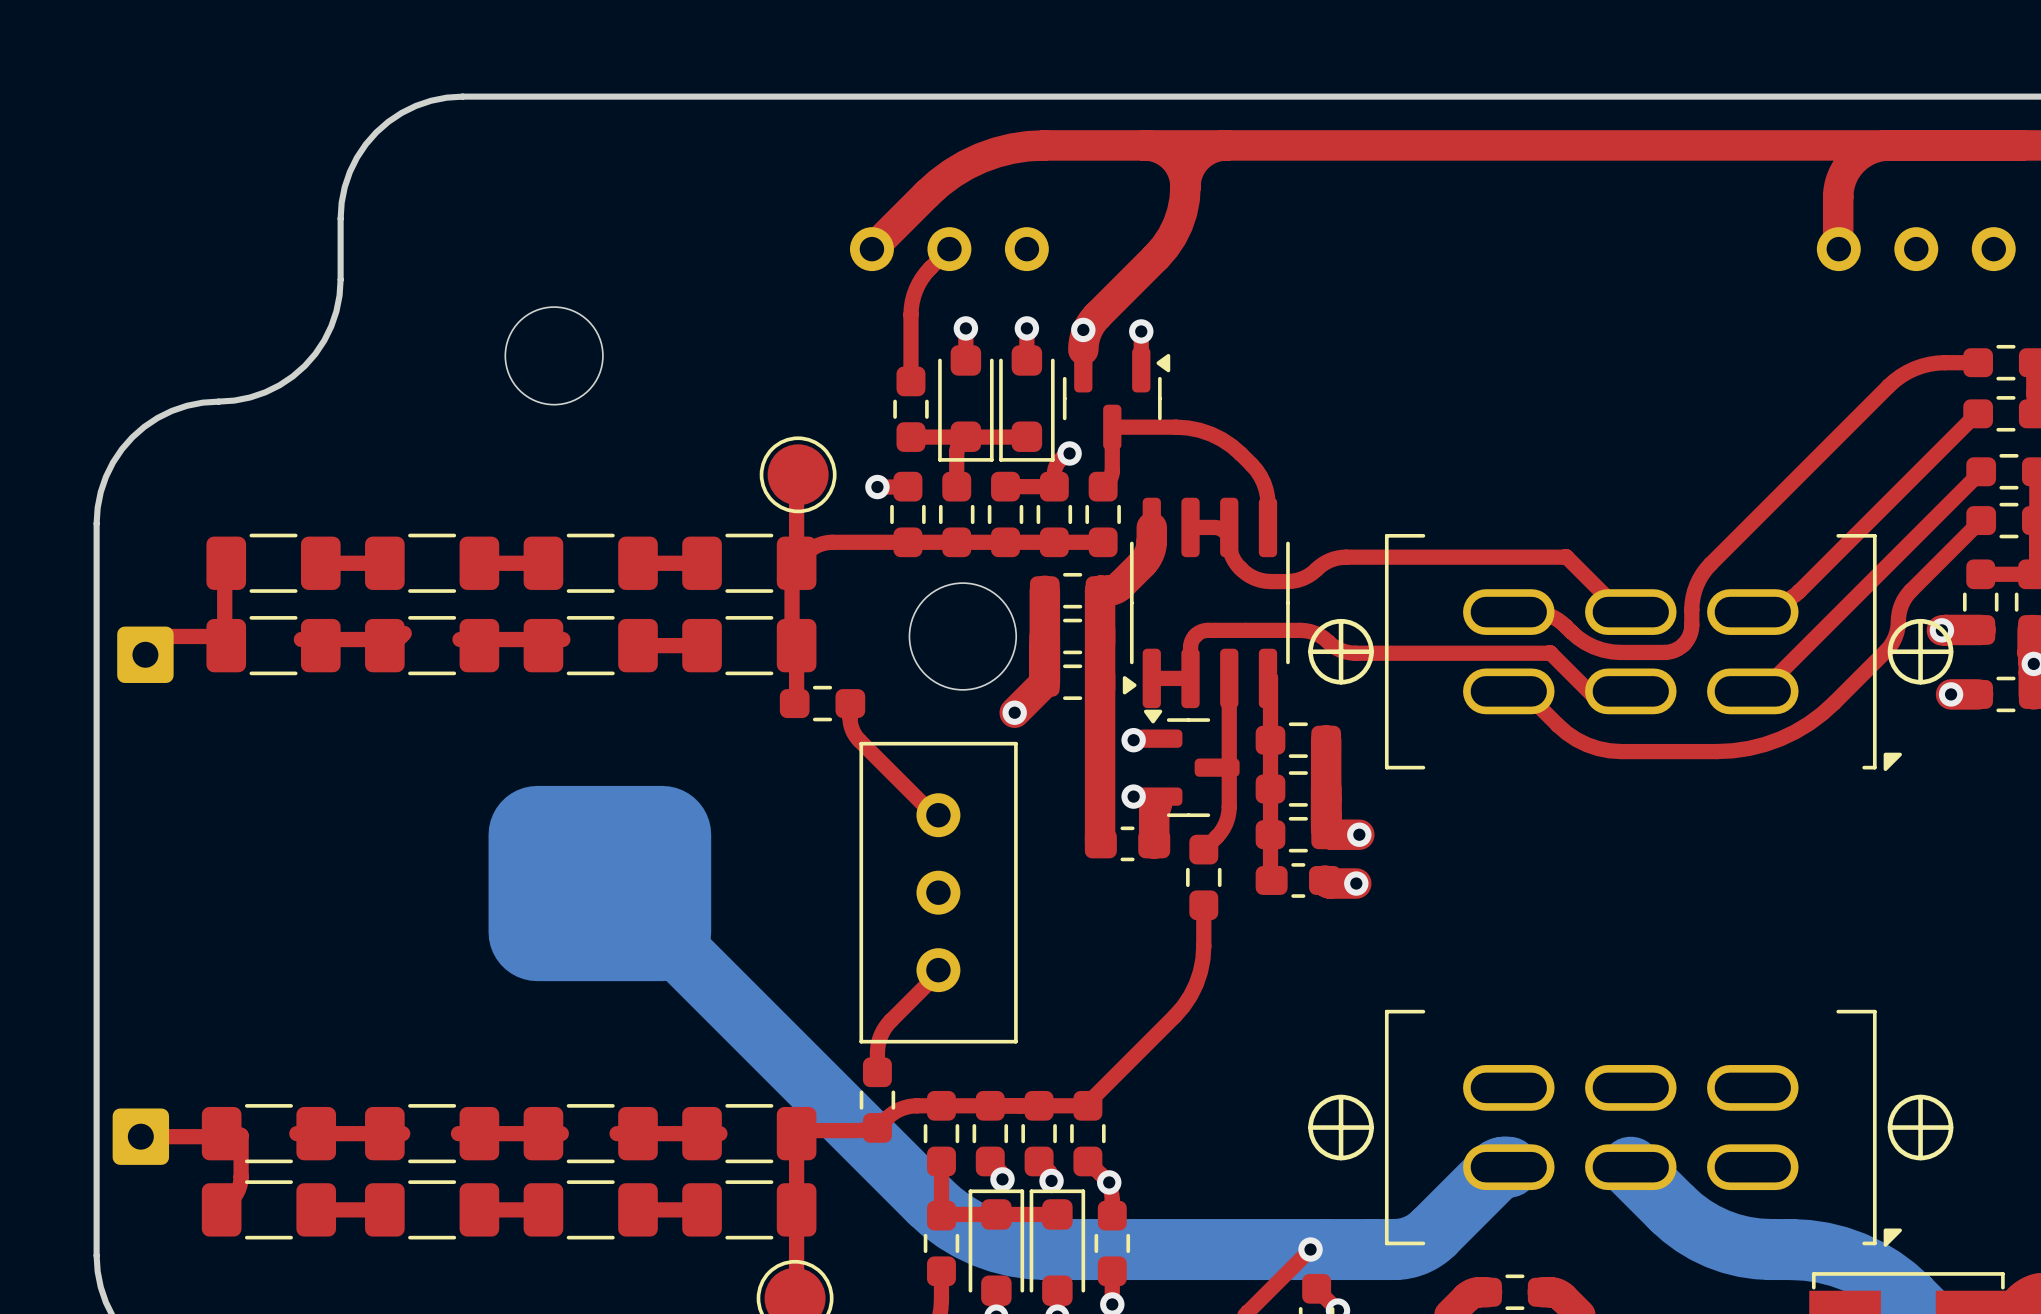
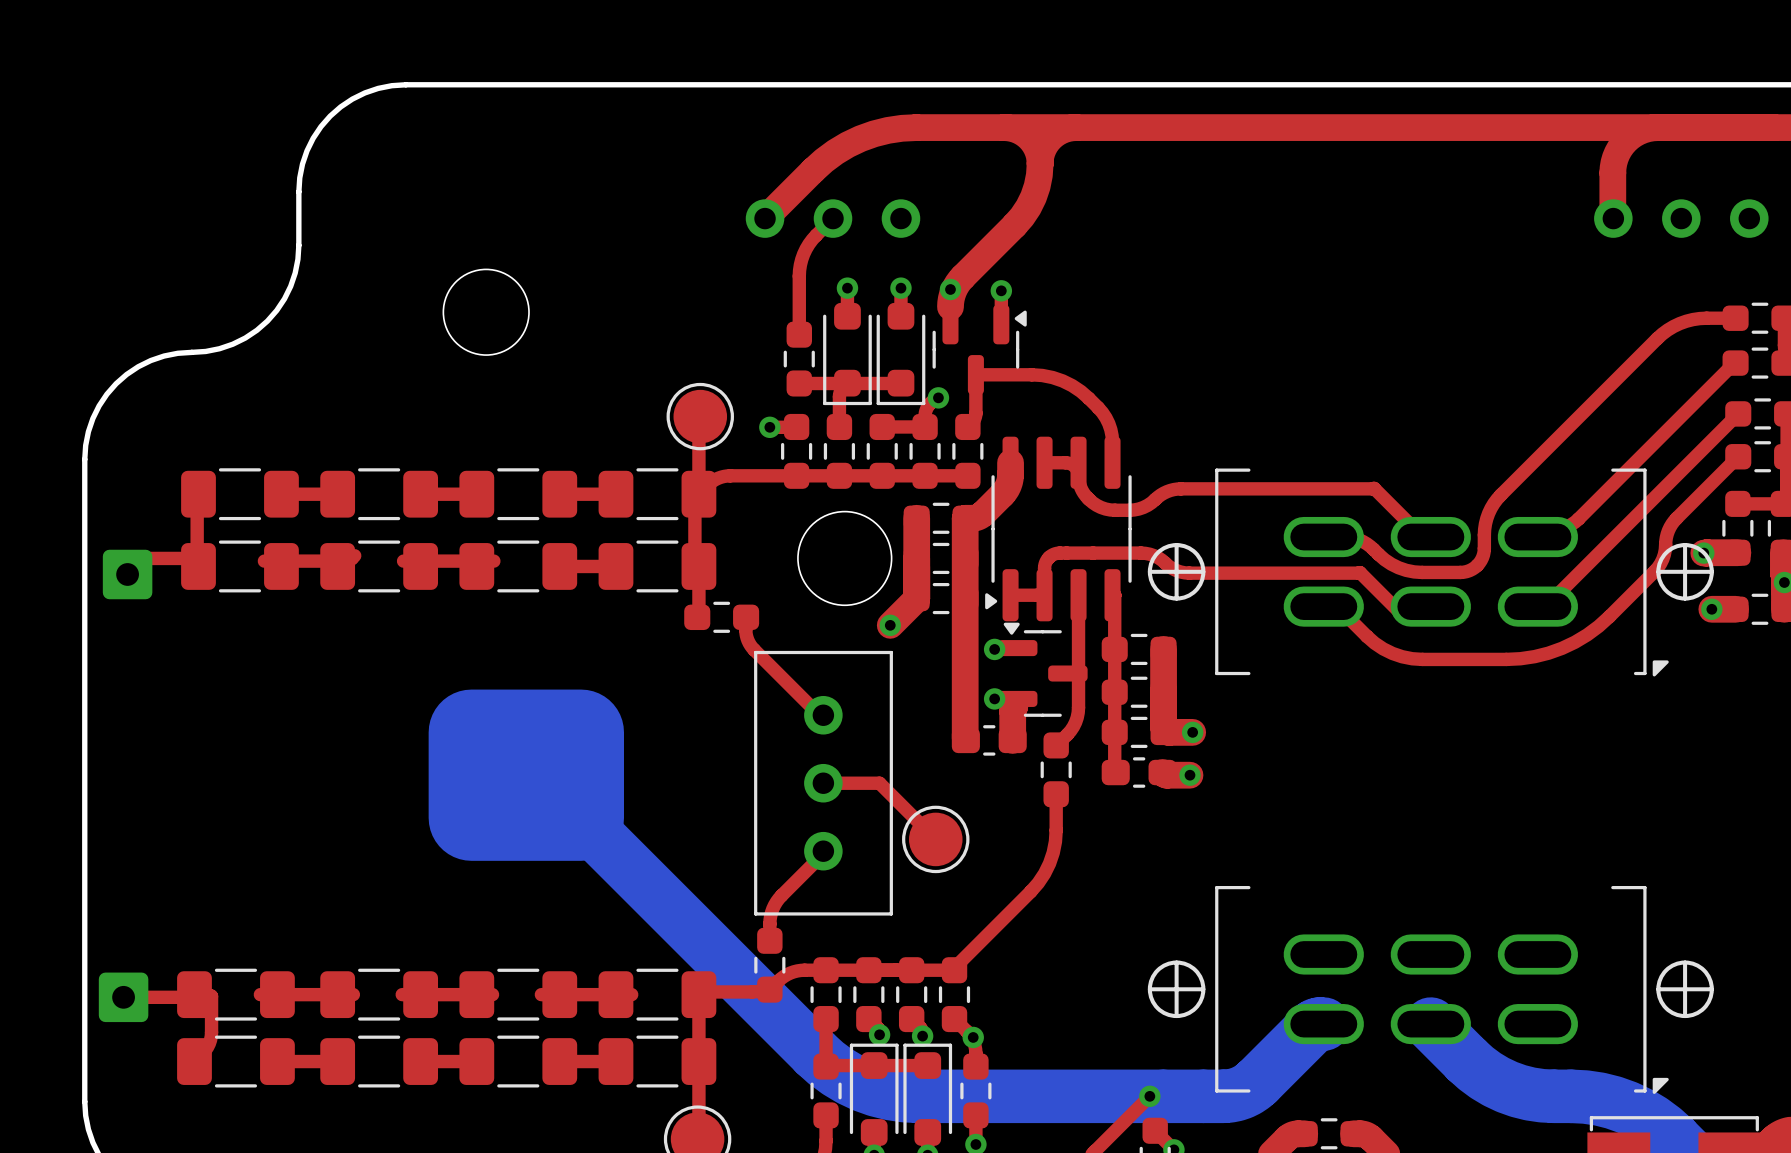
top track: none -> (823, 783) (879, 783) (935, 839)
part: none -> (935, 839)

